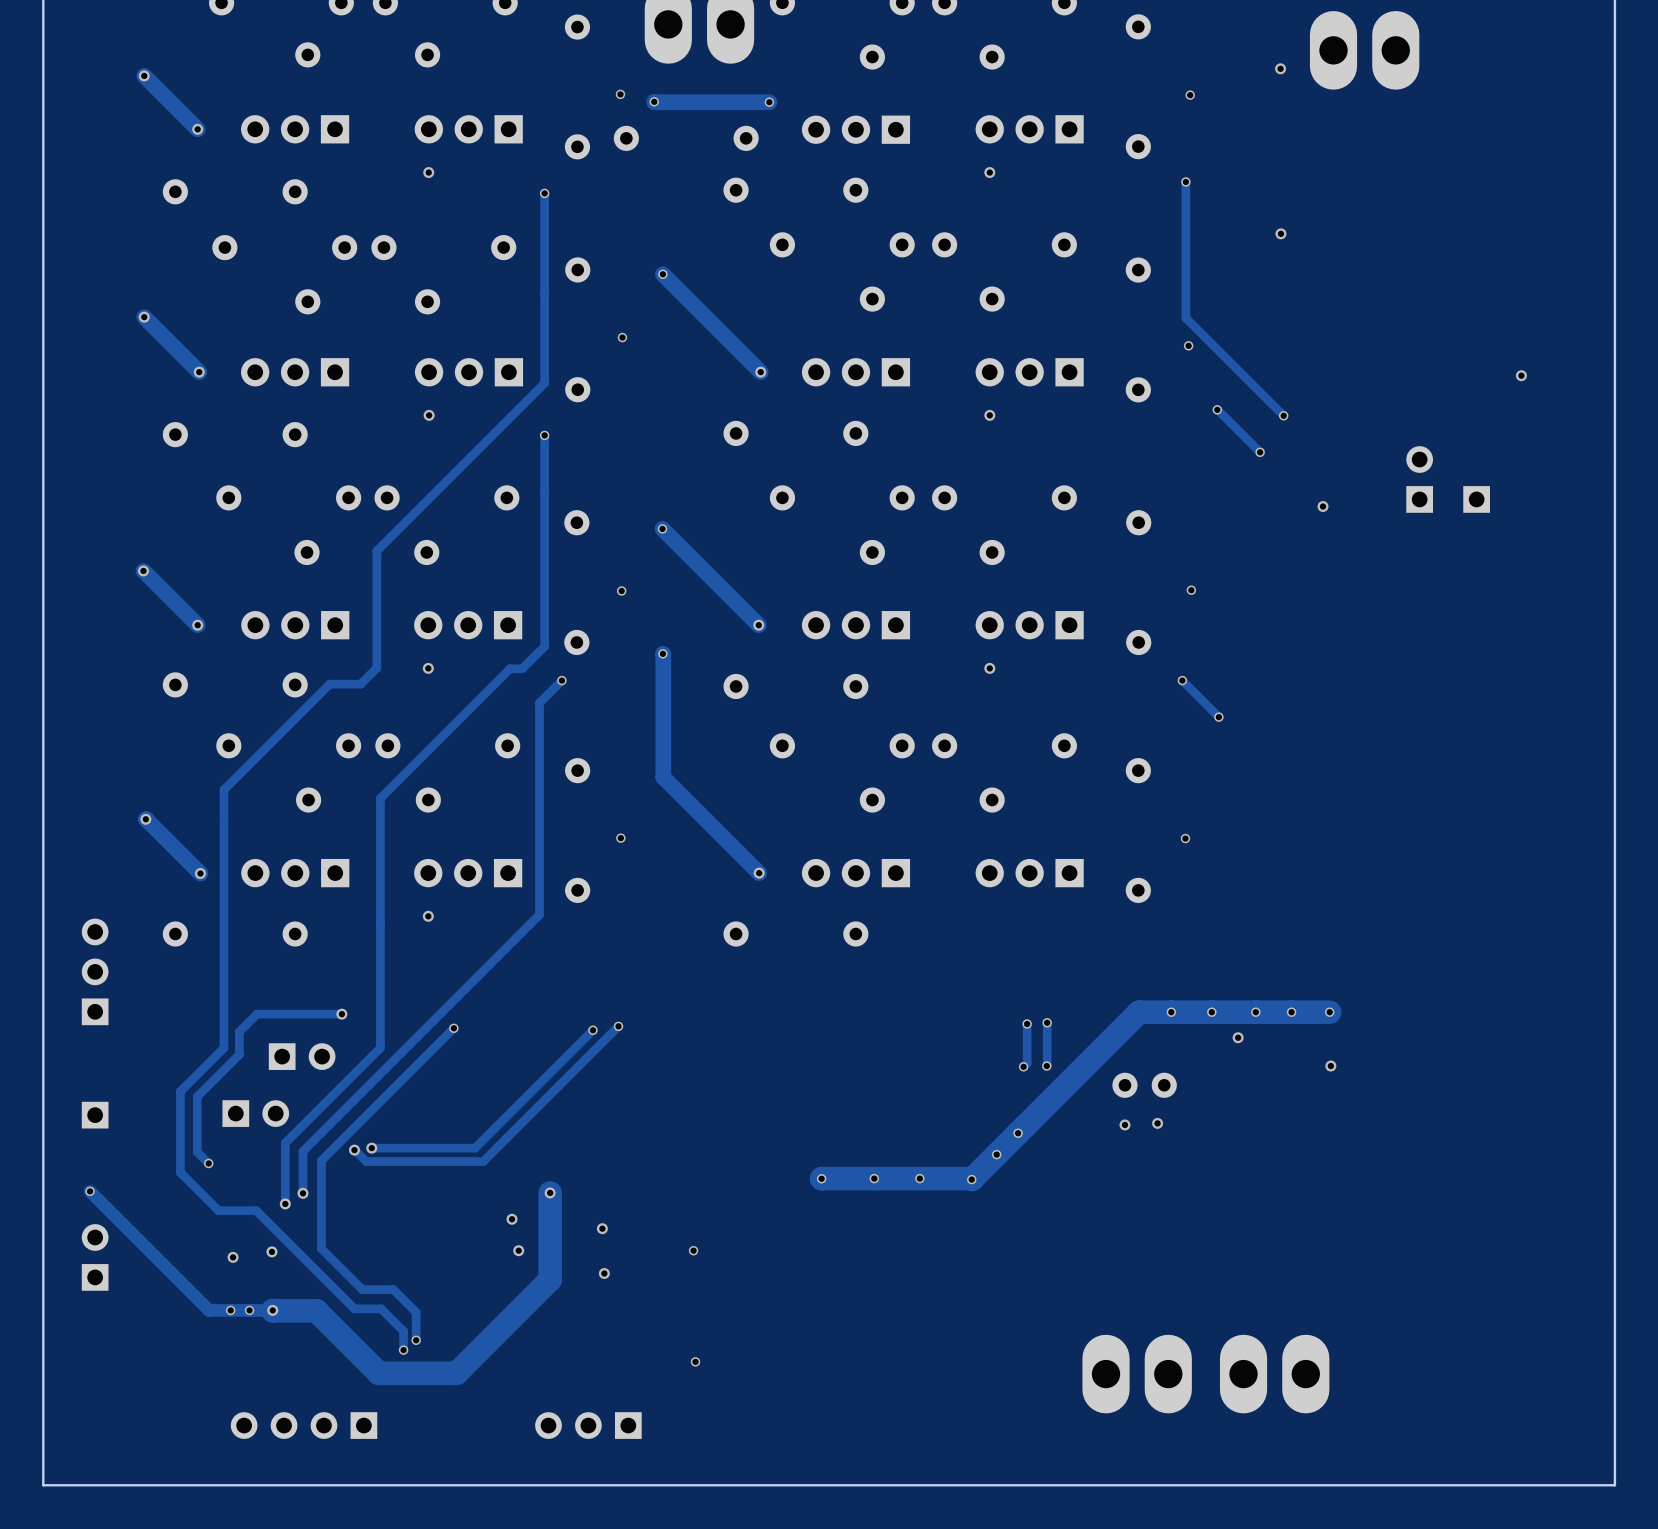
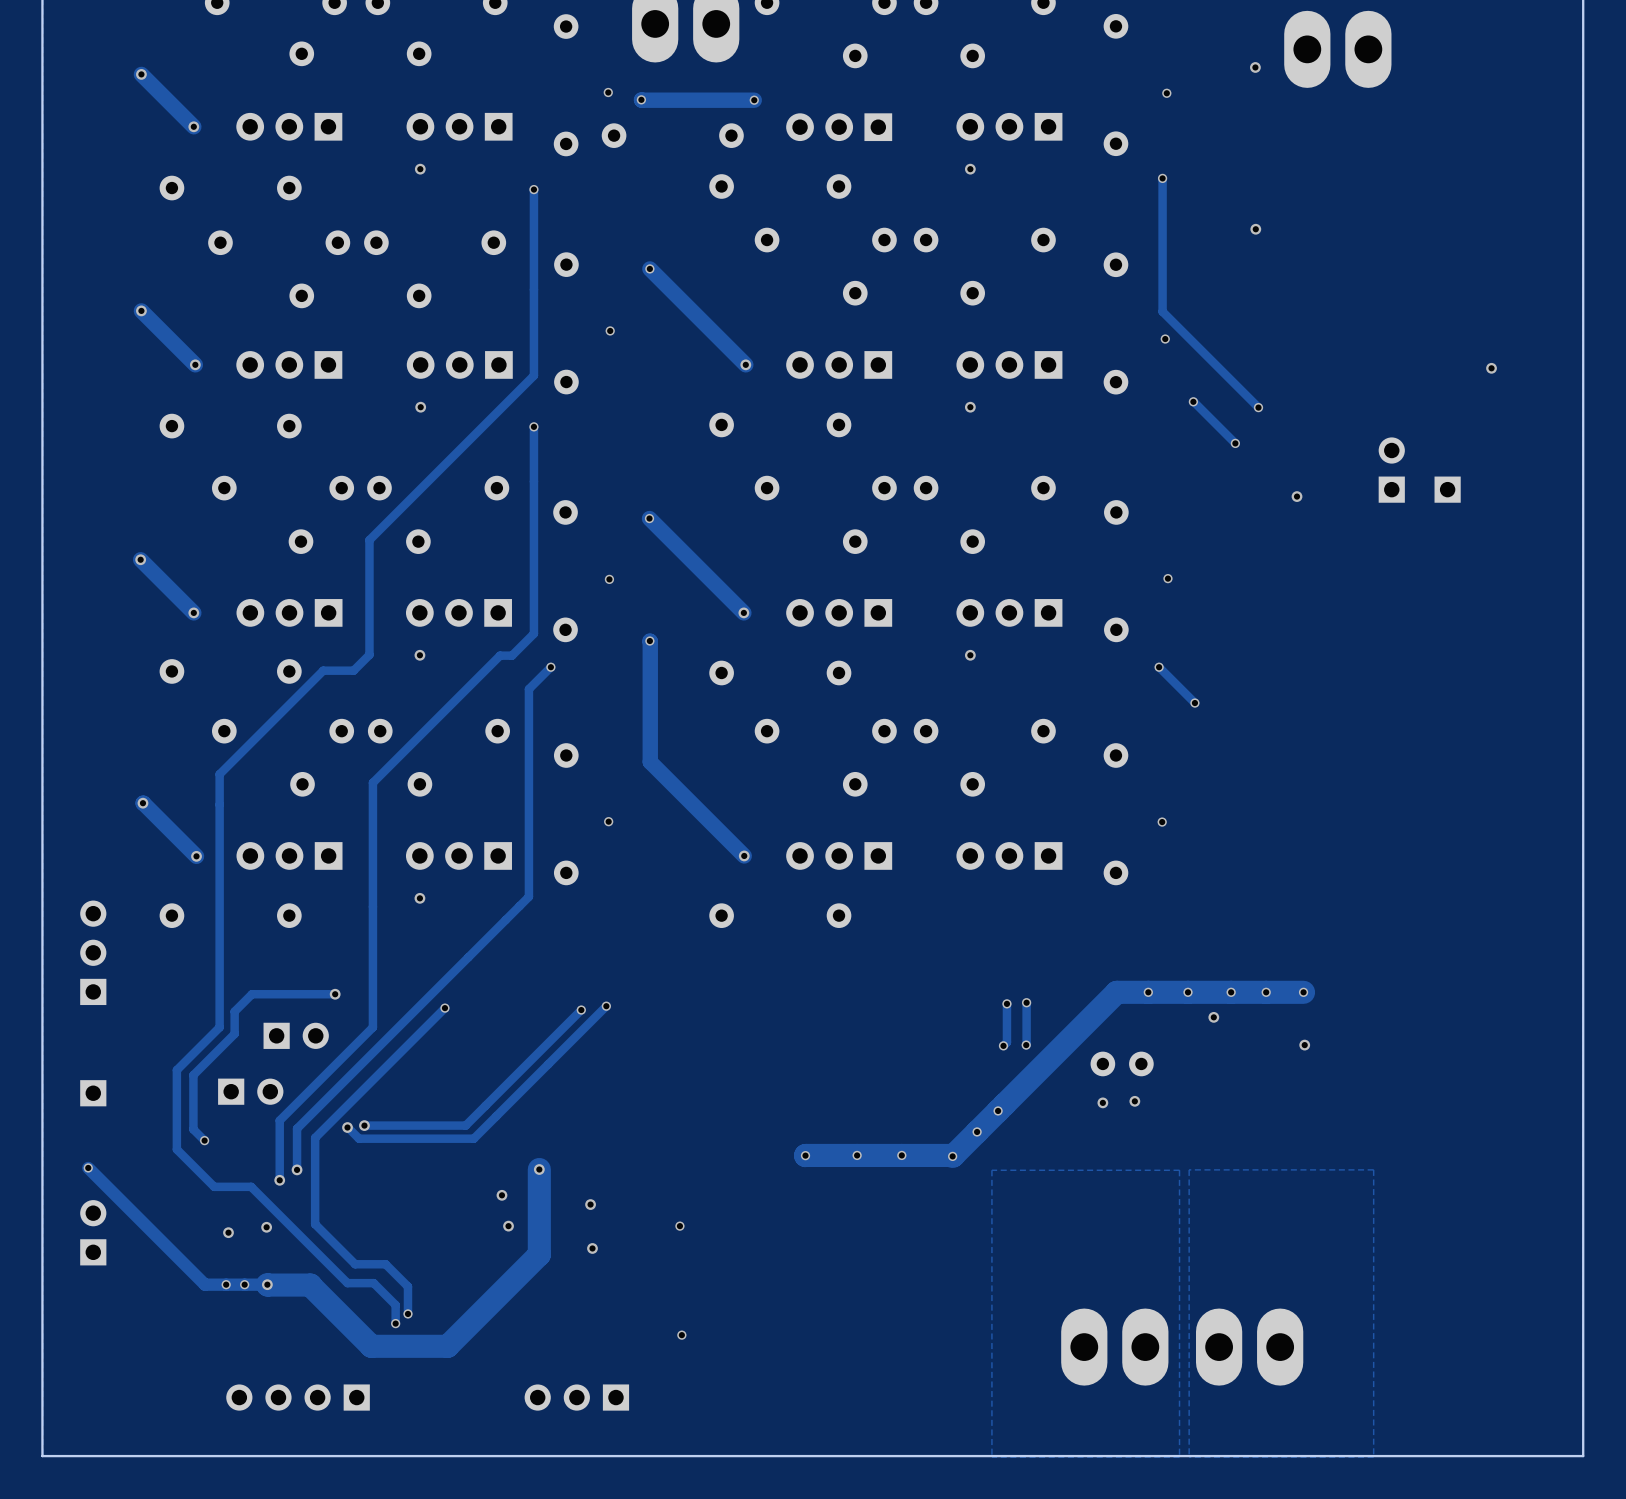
zone outline: none -> (1179, 1170) (1179, 1457) (991, 1457) (991, 1170) (1179, 1170)
zone outline: none -> (1373, 1169) (1373, 1457) (1189, 1457) (1189, 1169) (1373, 1169)

